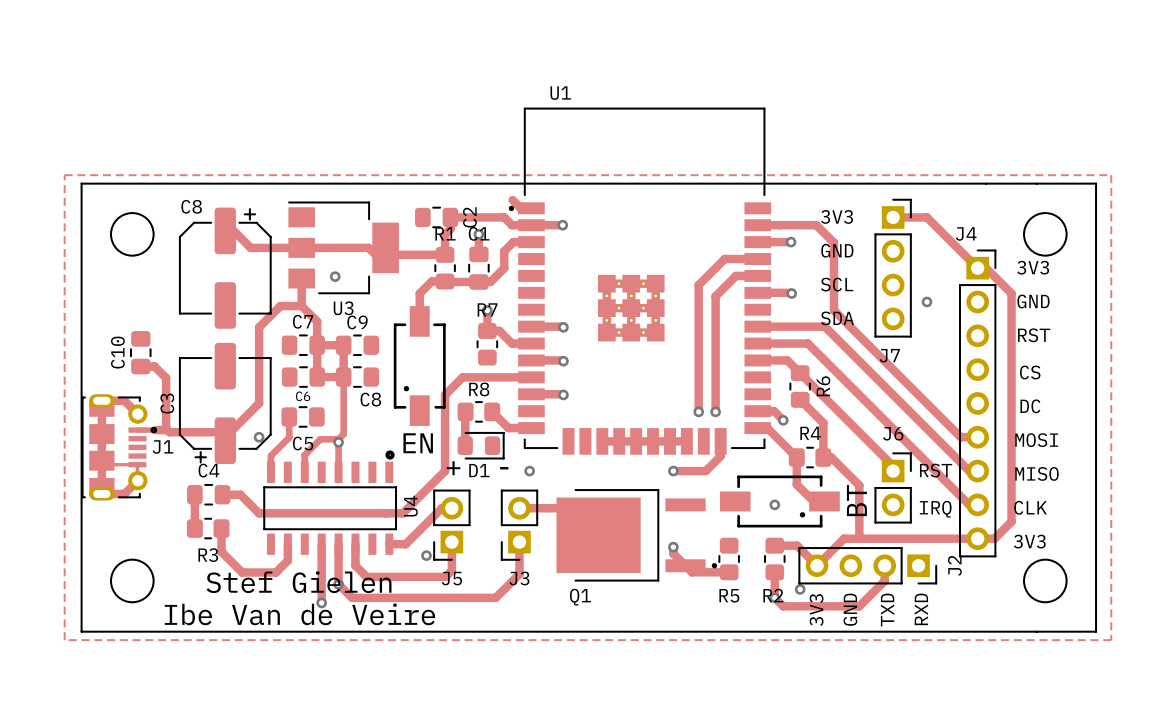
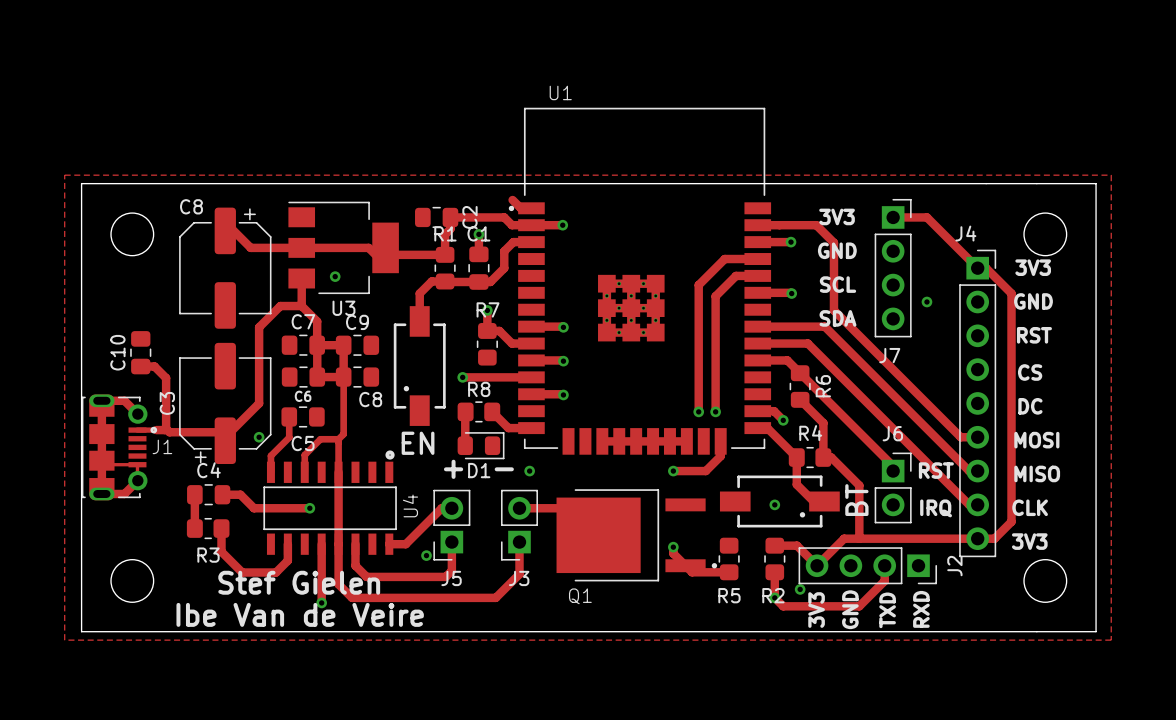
track: (462, 377) (445, 394) (445, 471) (402, 513) (259, 513) (254, 508) -> (309, 508) (254, 508)
via: none -> (462, 377)
via: (338, 442) -> none
track: none -> (338, 472) (338, 544)
via: none -> (309, 508)
via: (338, 584) -> none

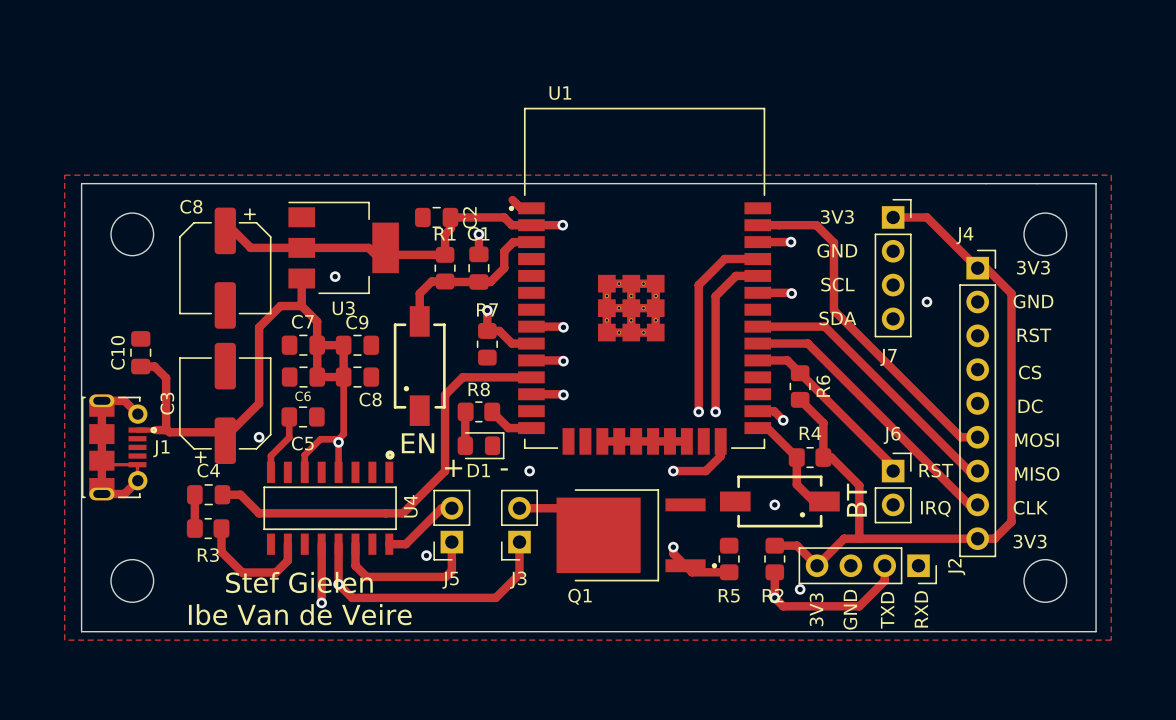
via: (462, 377) -> none
via: none -> (338, 442)
track: (338, 472) (338, 544) -> none
track: (254, 508) (309, 508) -> (254, 508) (259, 513) (402, 513) (445, 471) (445, 394) (462, 377)
via: (309, 508) -> none
via: none -> (338, 584)

